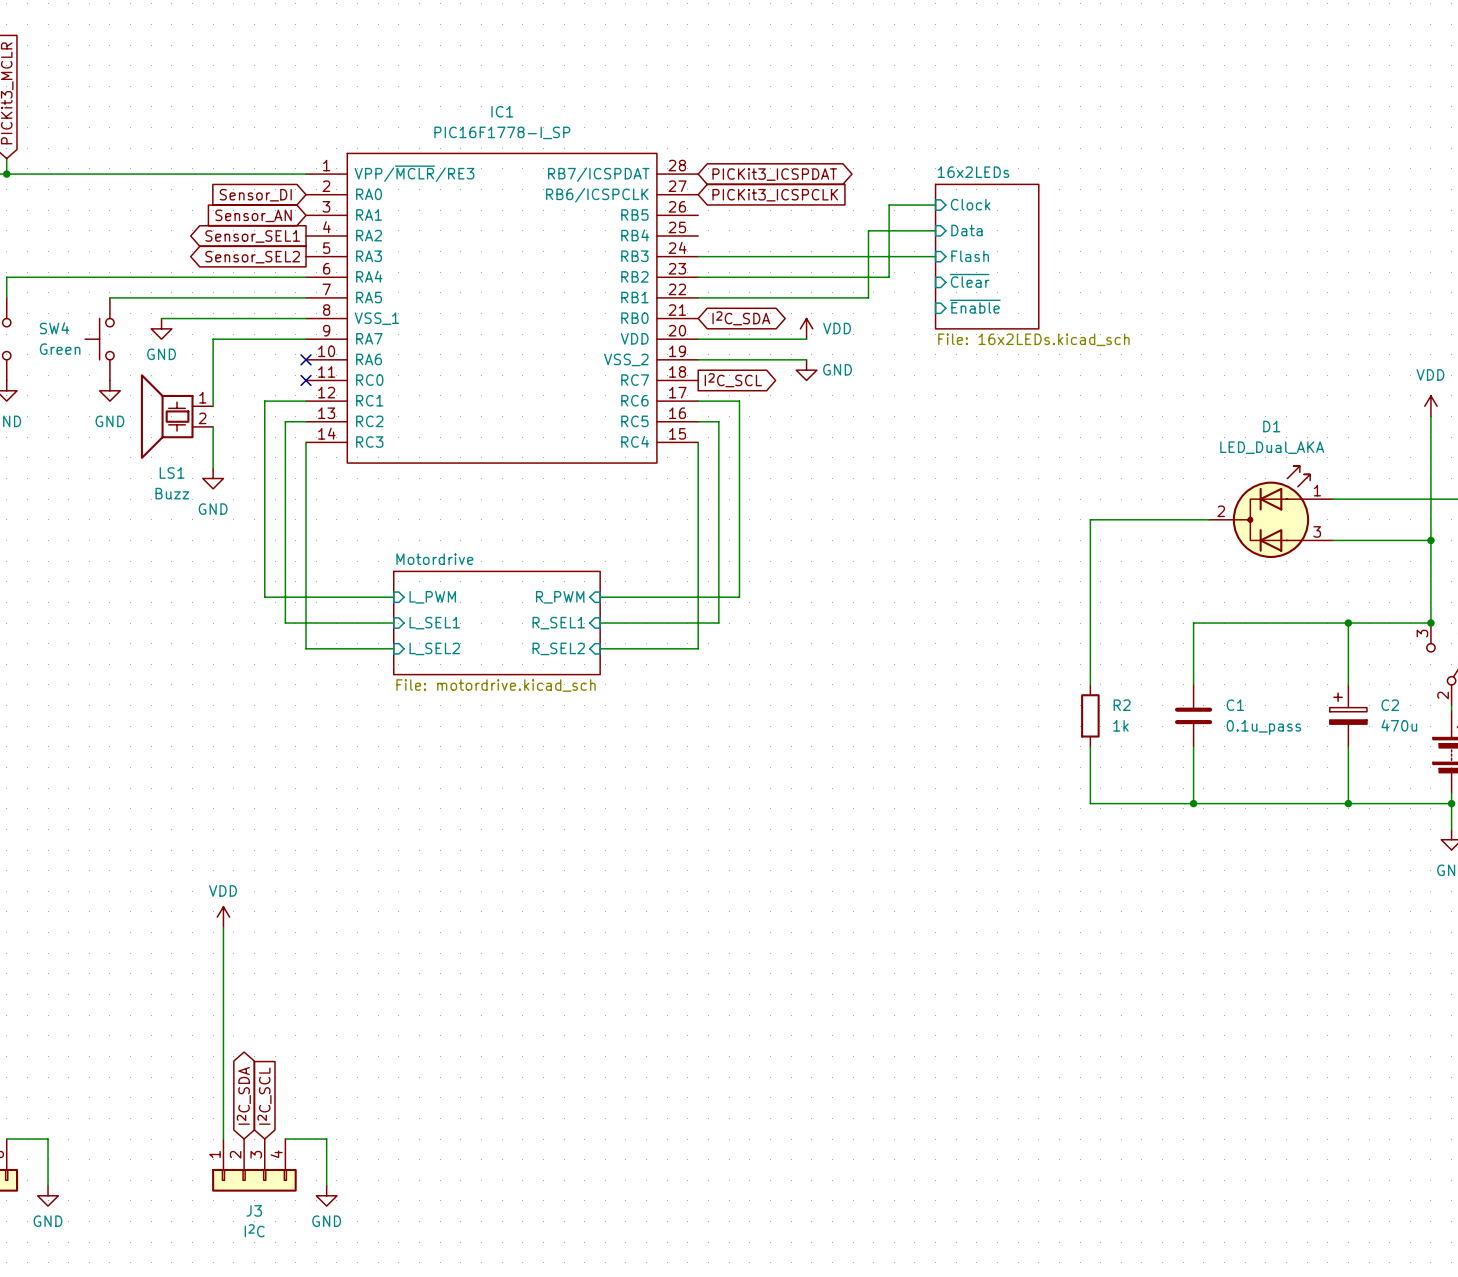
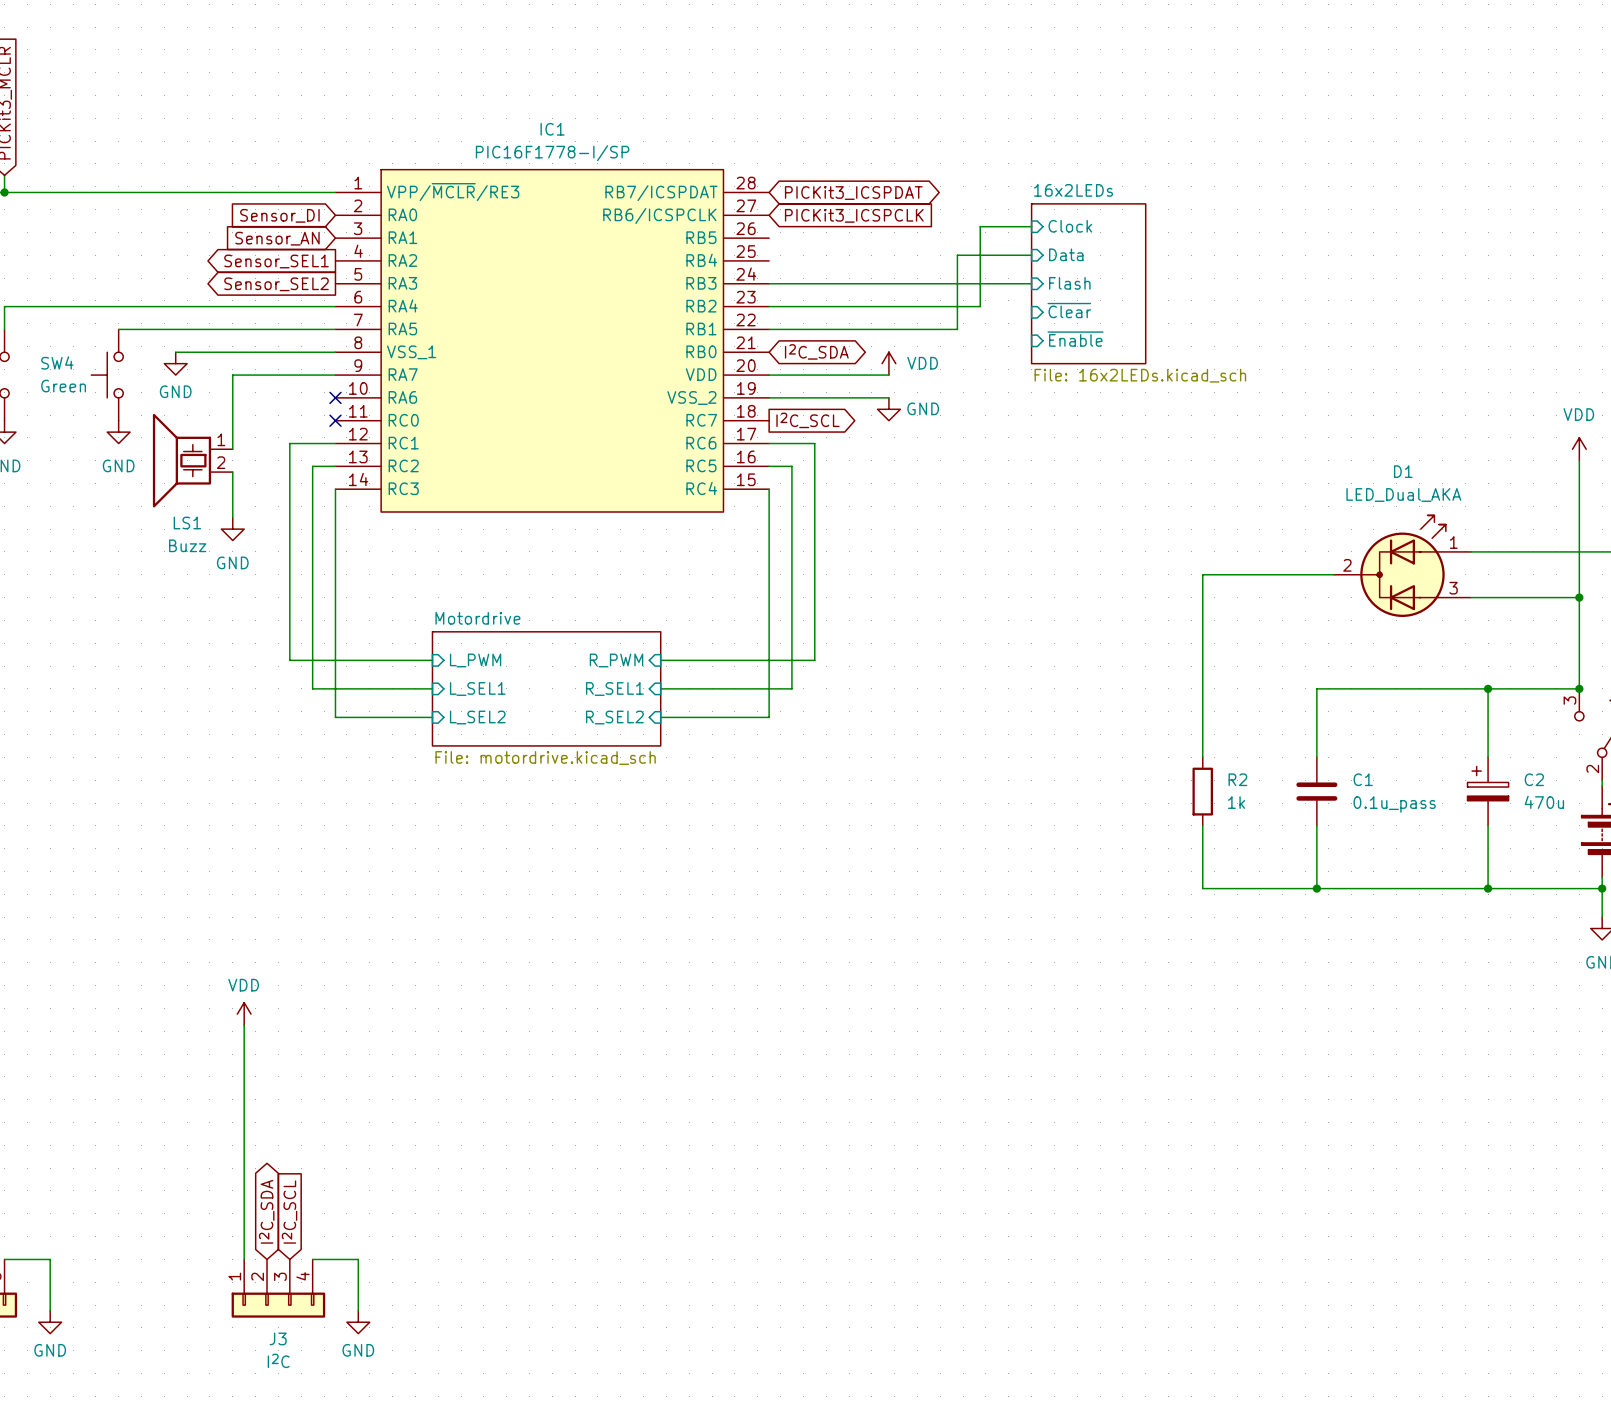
IC1 value: PIC16F1778-I_SP (502, 132) -> PIC16F1778-I/SP (552, 153)
IC1 symbol: [306, 152, 699, 464] -> [335, 168, 770, 513]

